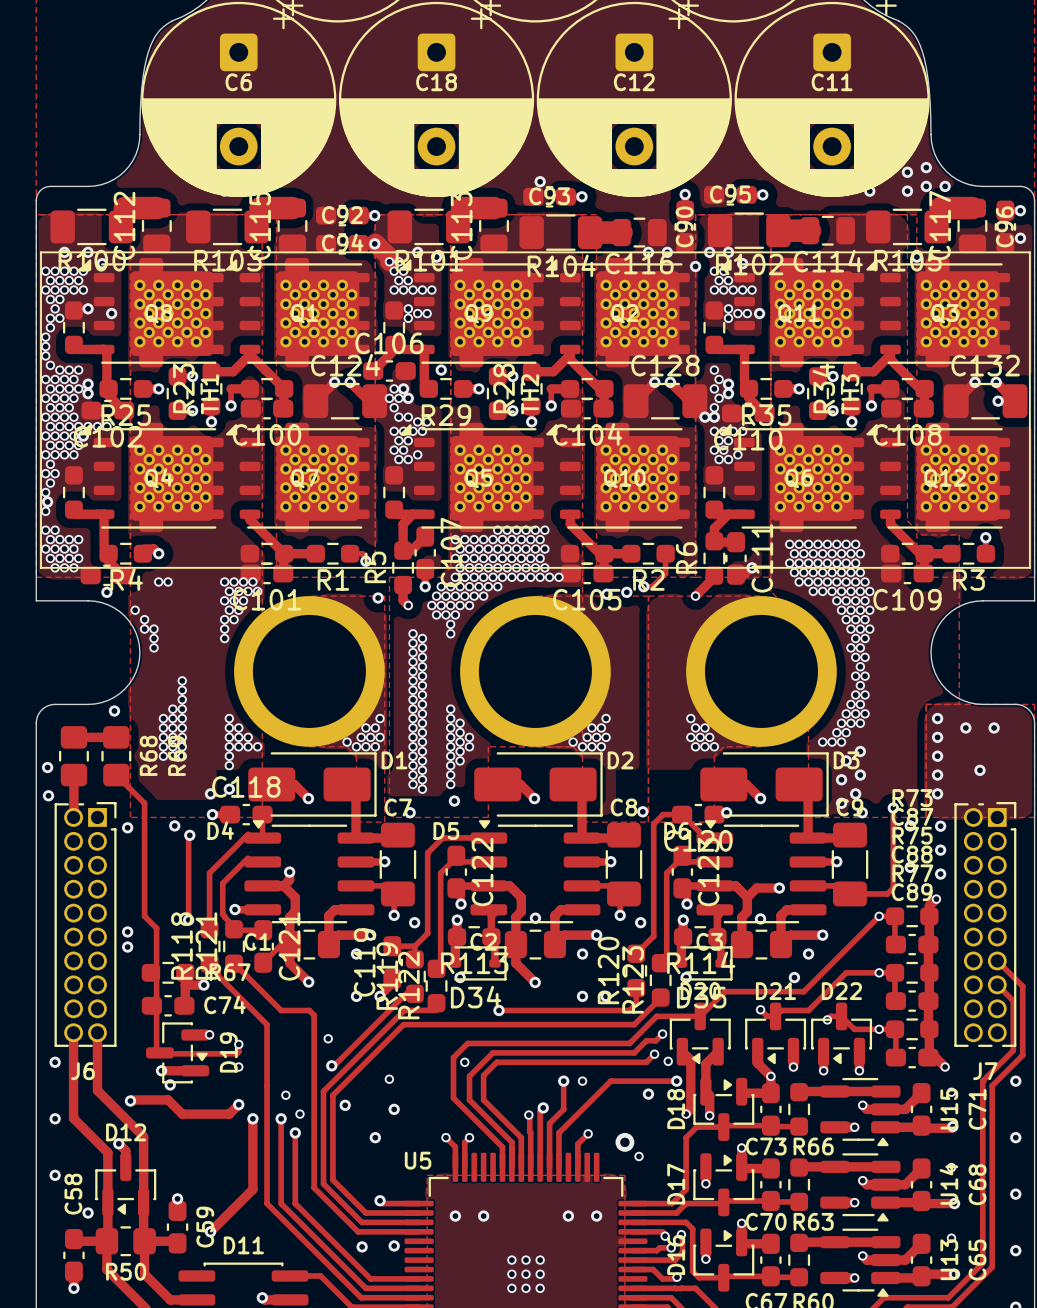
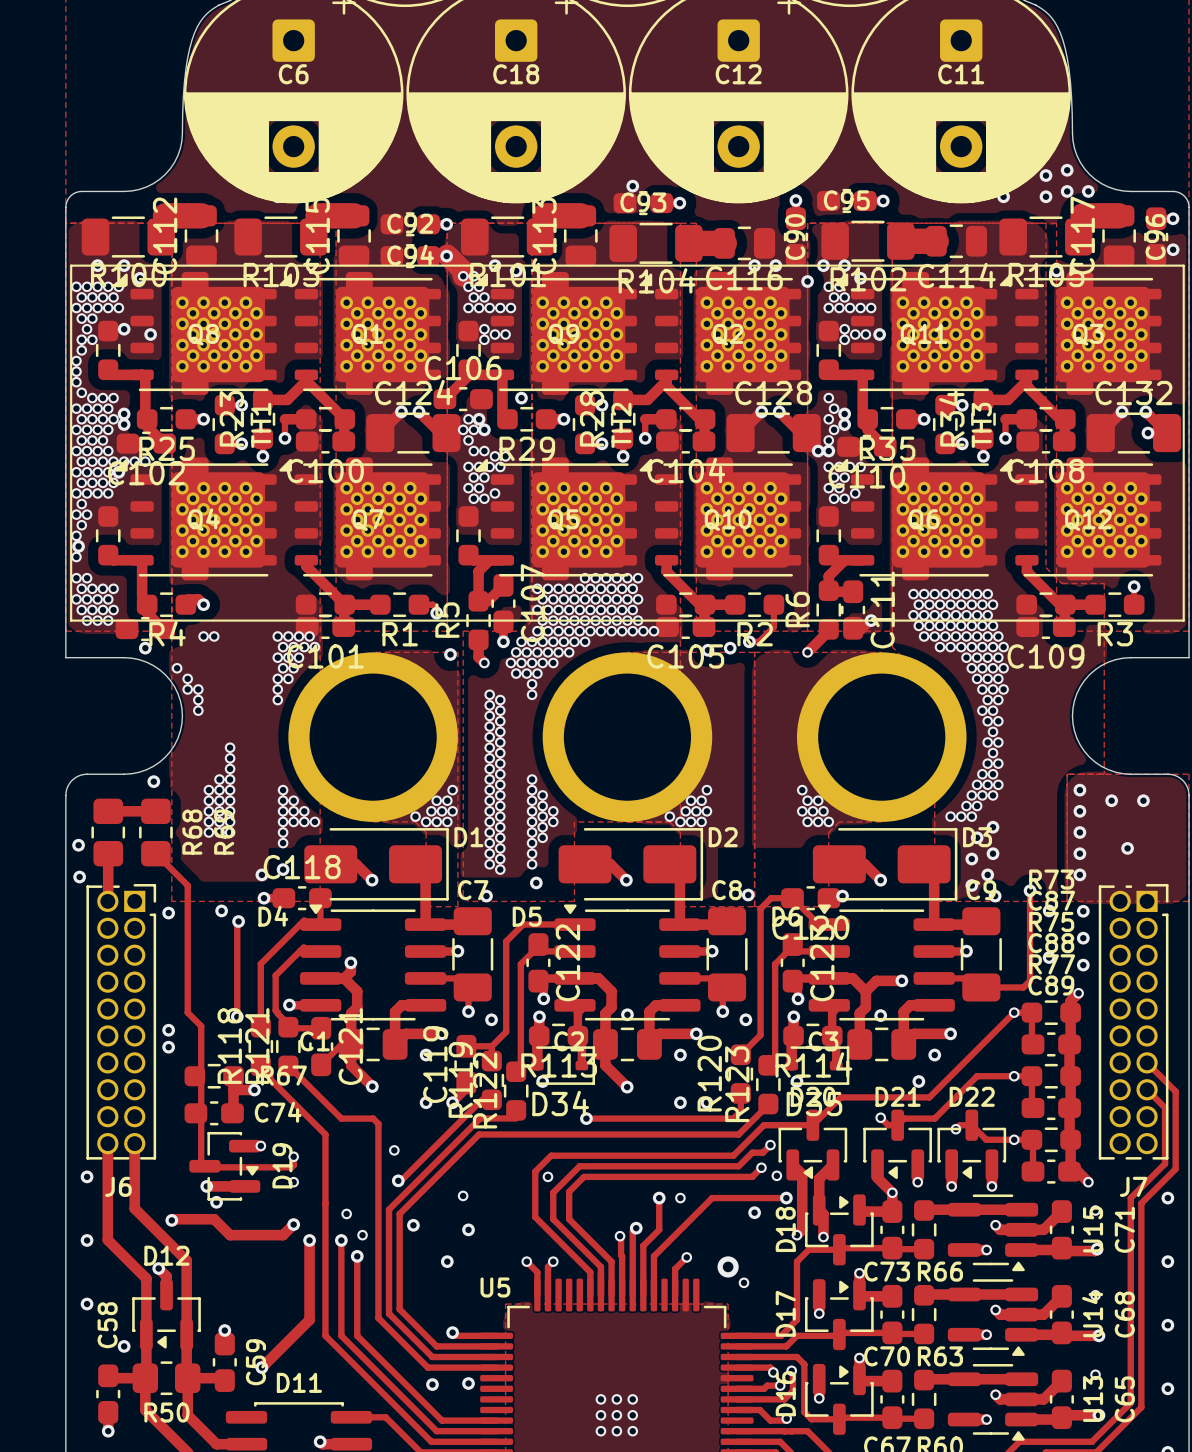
via: (455, 1216) -> none
via: (483, 1216) -> none
via: (568, 1216) -> none
via: (596, 1216) -> none

